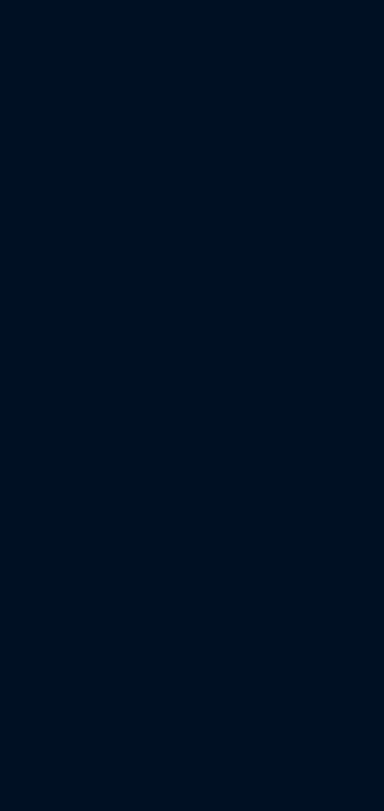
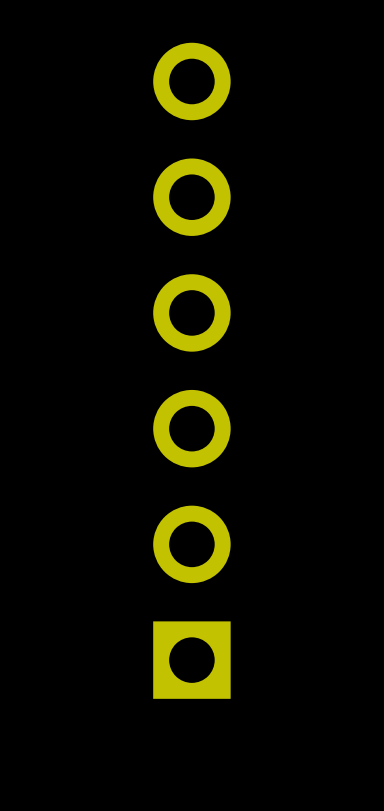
part: none -> (191, 370)

